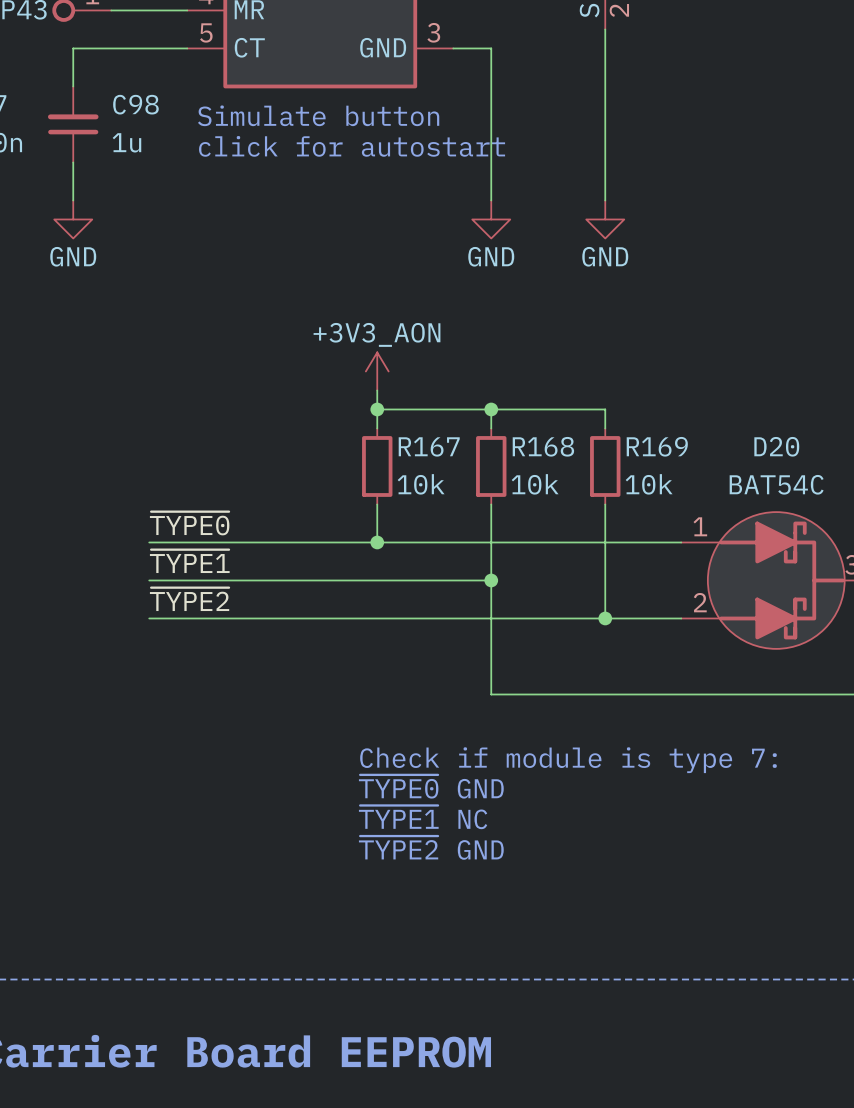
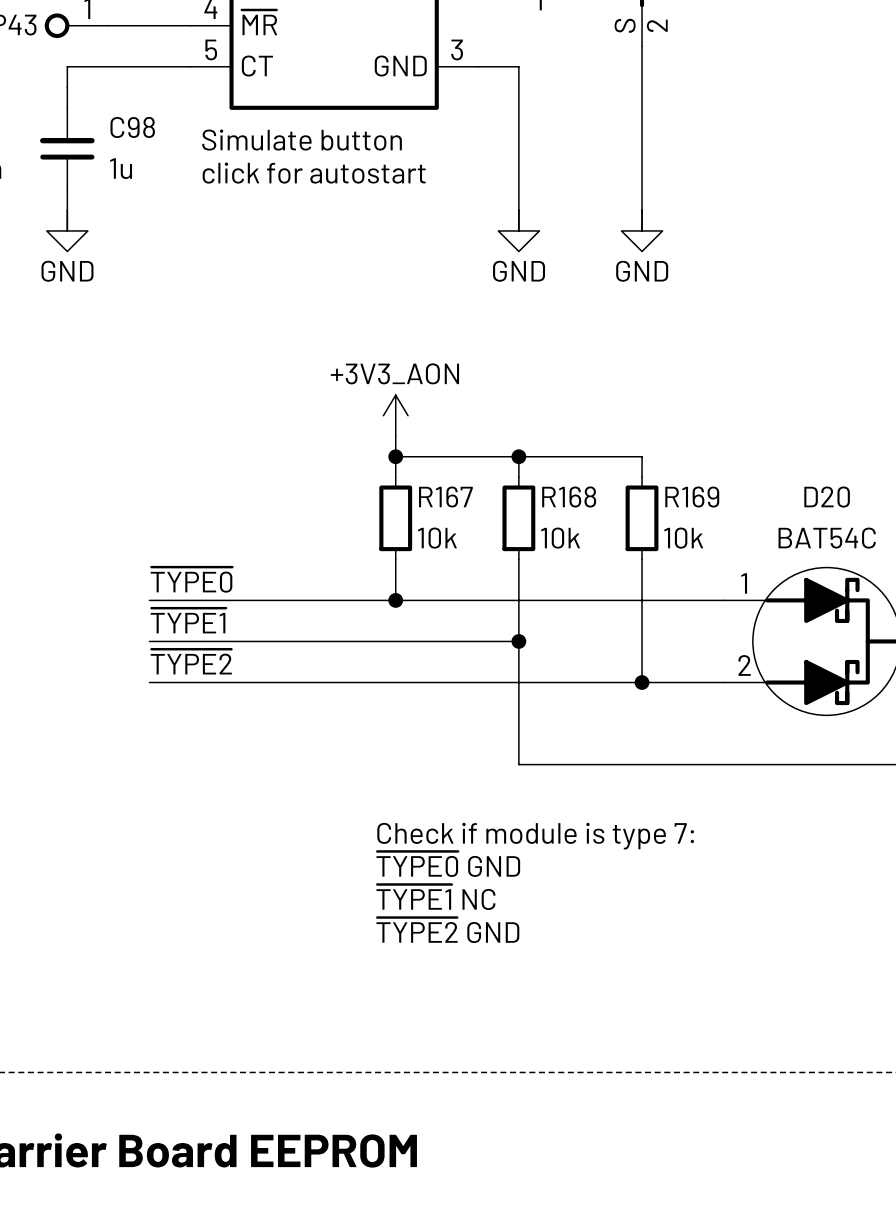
power symbol position: GND (73, 219) -> GND (67, 230)
power symbol position: GND (491, 219) -> GND (518, 230)
power symbol position: GND (605, 219) -> GND (642, 230)

